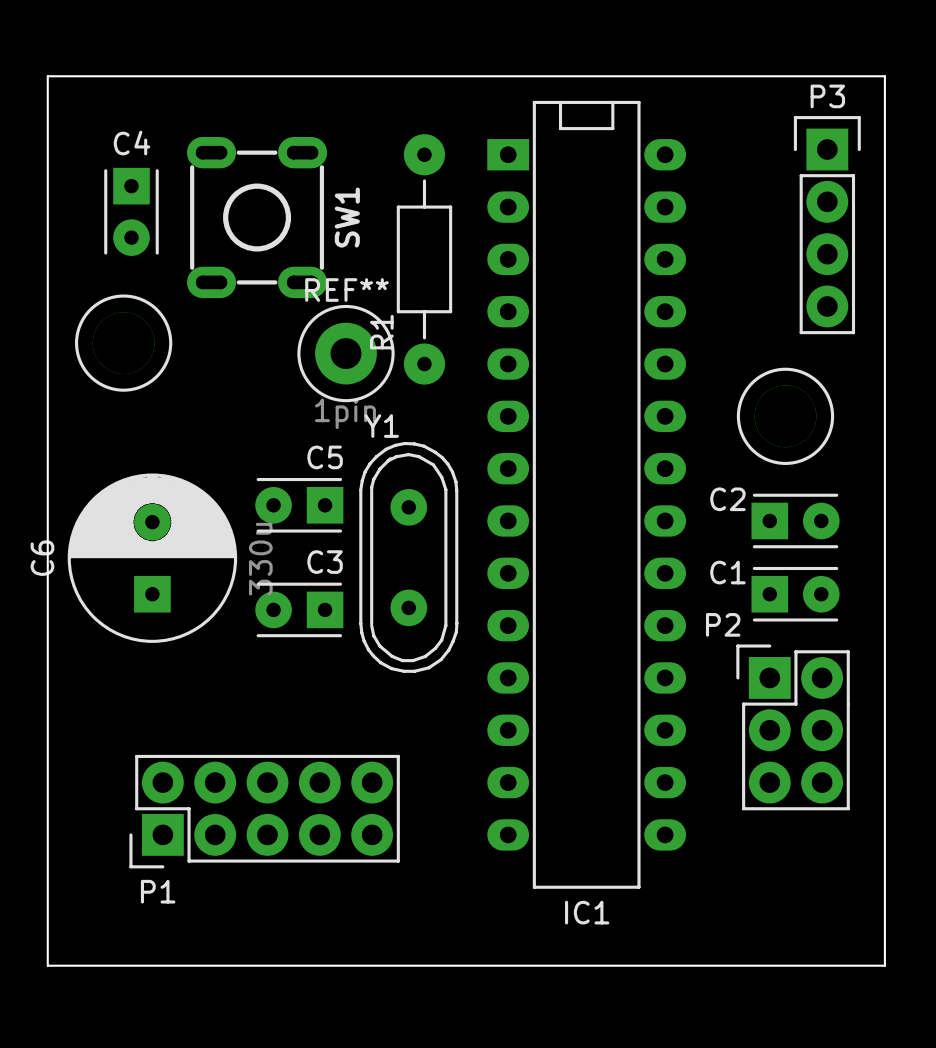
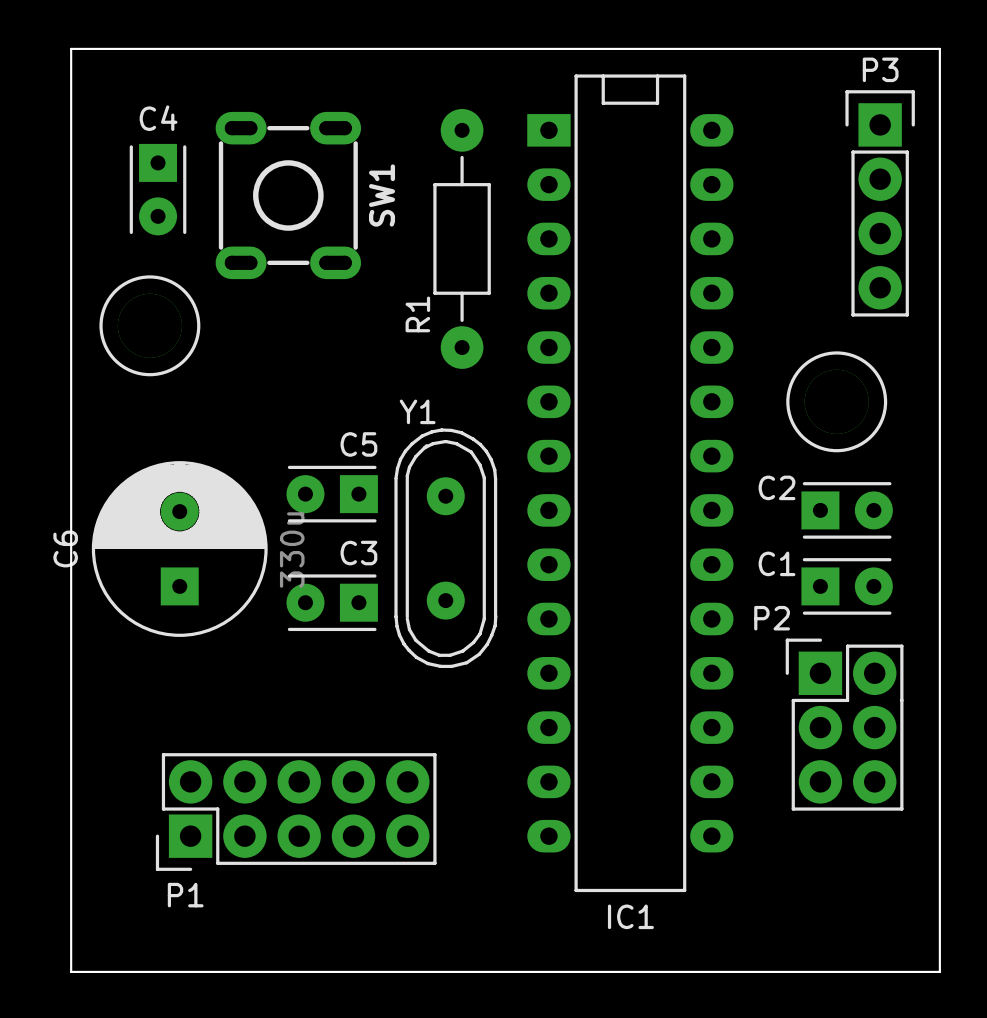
REF**: 1pin (346, 353) -> none

